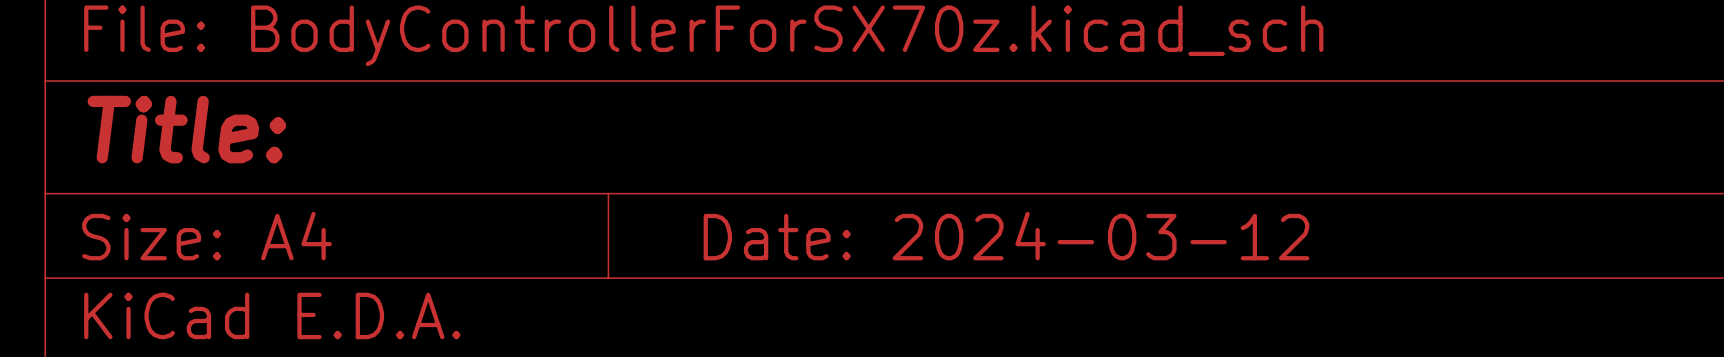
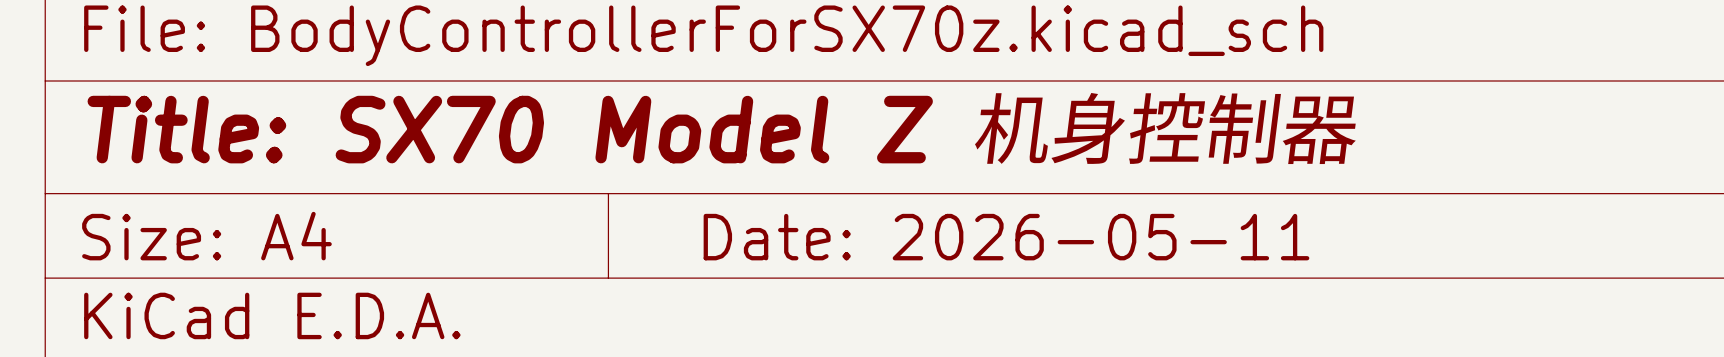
title block: Title: (186, 129) -> Title: SX70 Model Z 机身控制器 (724, 128)
title block: Date: 2024-03-12 (1006, 236) -> Date: 2026-05-11 (1006, 237)

